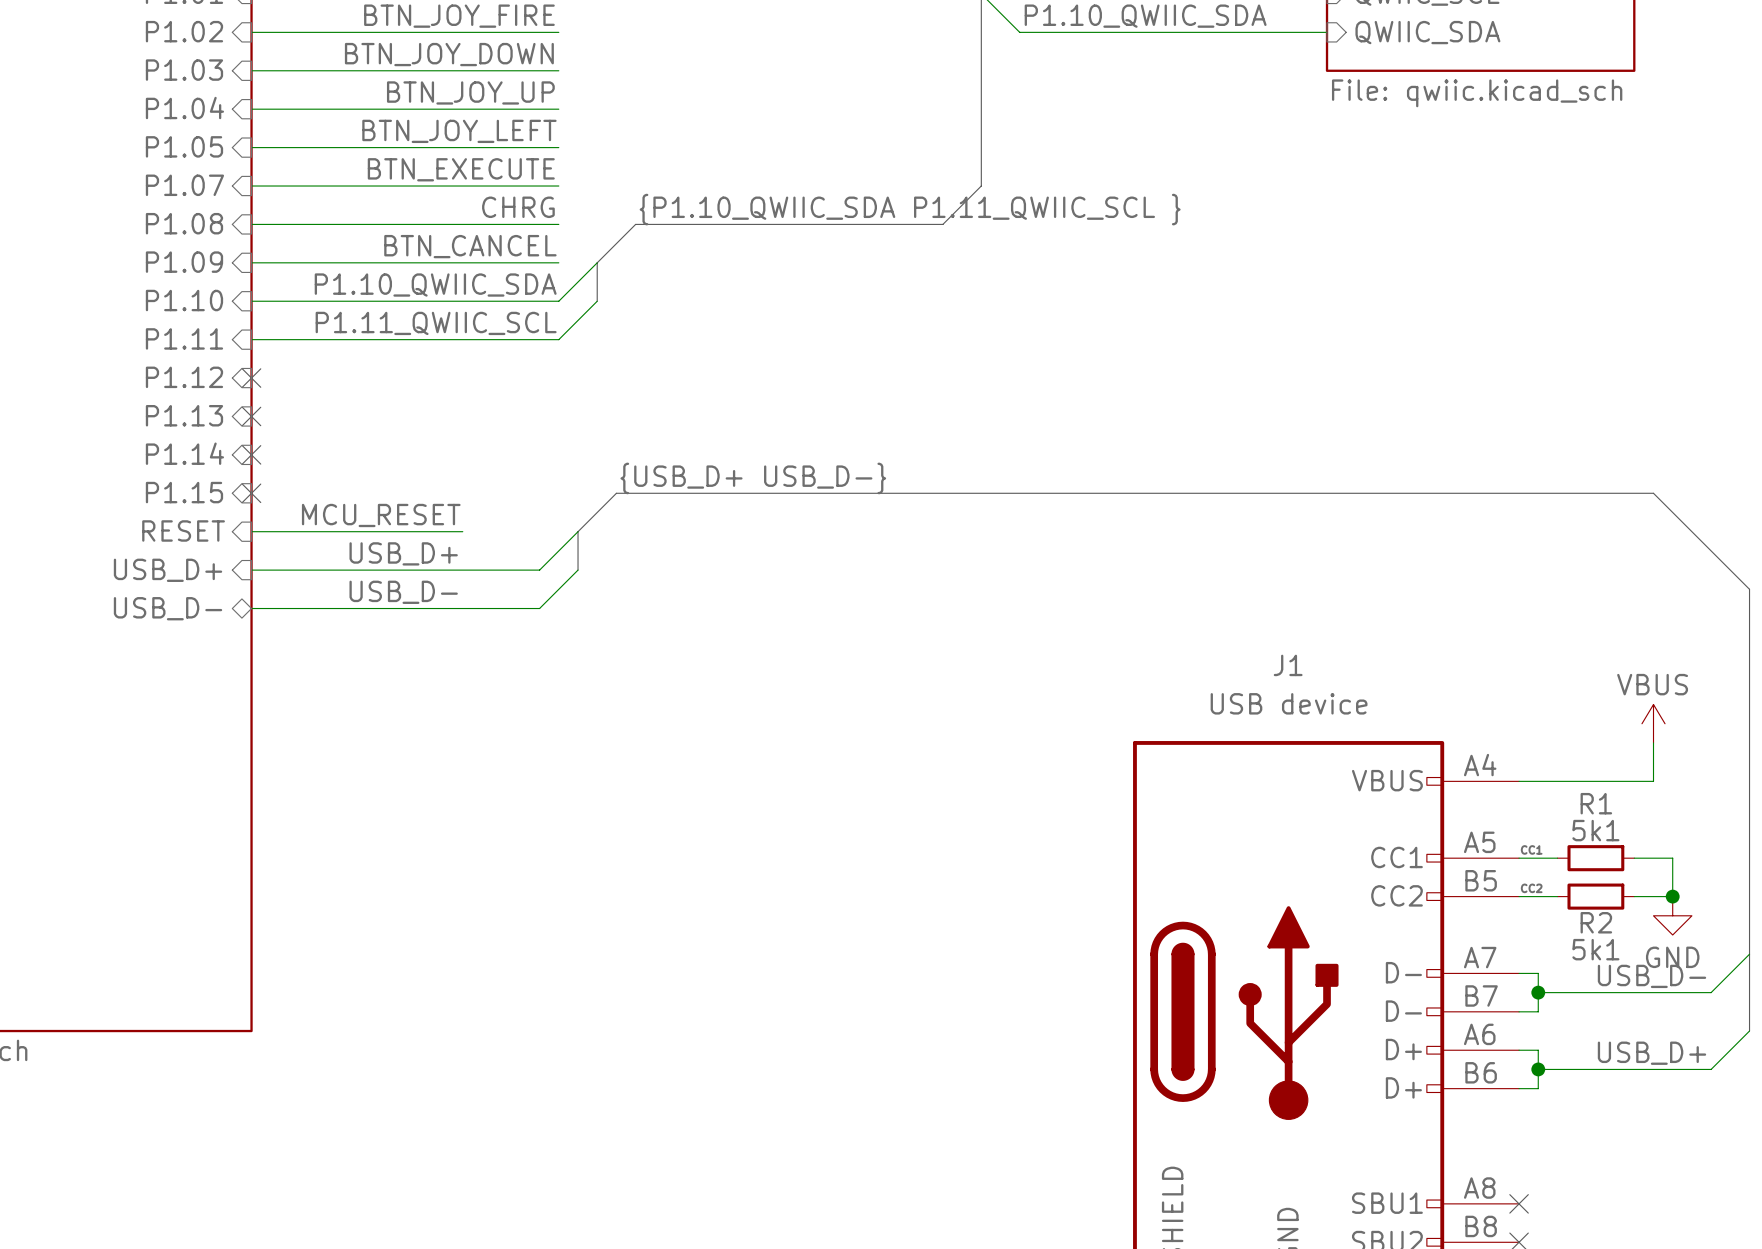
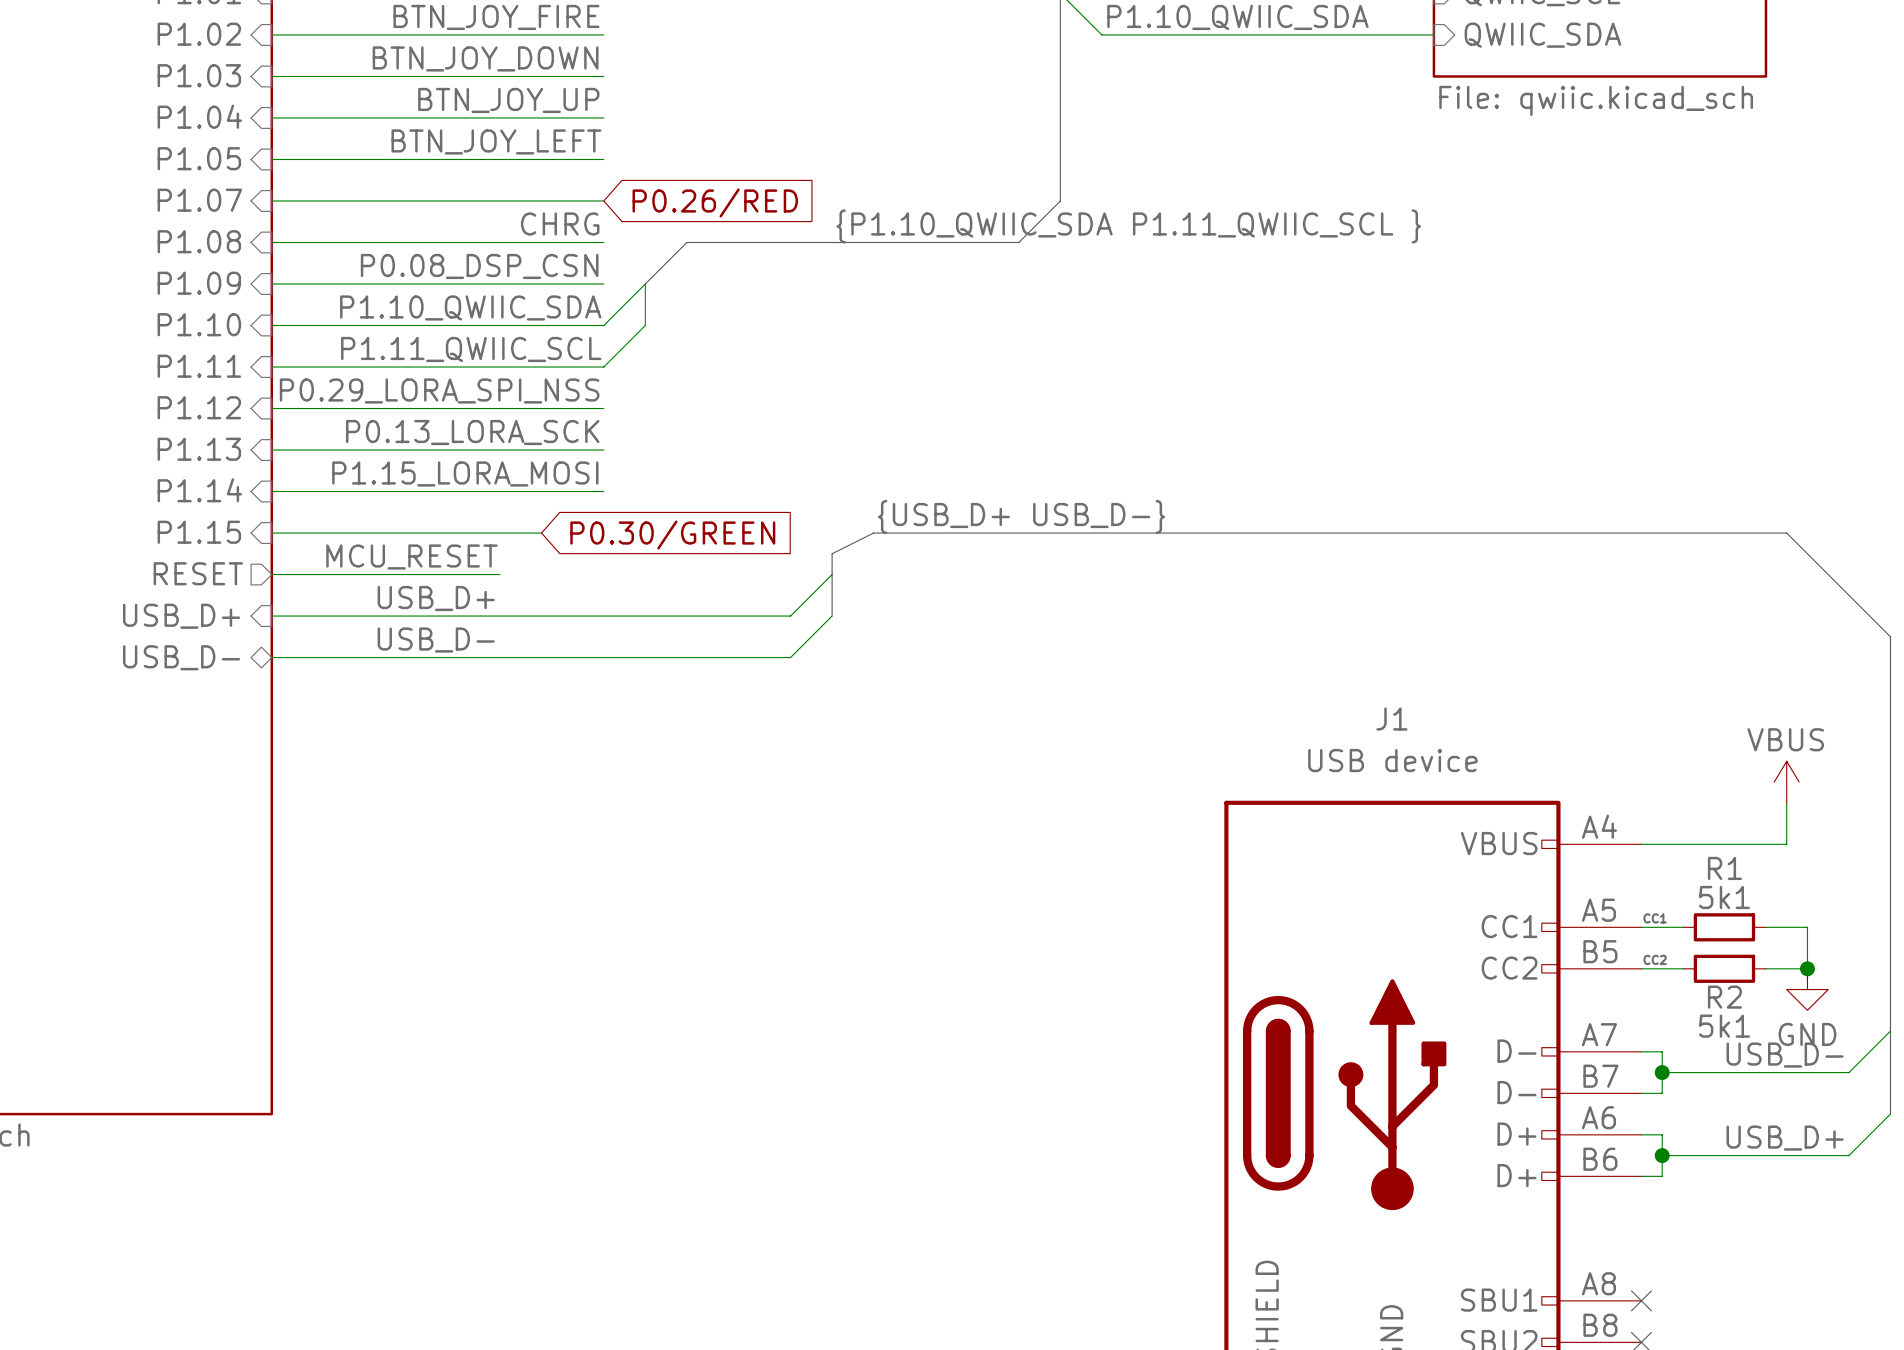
label: BTN_EXECUTE (461, 169) -> none
global label: none -> P0.26/RED (715, 202)
label position: {P1.10_QWIIC_SDA P1.11_QWIIC_SCL } (910, 209) -> {P1.10_QWIIC_SDA P1.11_QWIIC_SCL } (1128, 226)
label: BTN_CANCEL (470, 246) -> P0.08_DSP_CSN (479, 266)
label: none -> P0.29_LORA_SPI_NSS (439, 390)
wire: none -> (271, 408) (603, 408)
no-connect mark: (251, 378) -> none
label: none -> P0.13_LORA_SCK (472, 432)
wire: none -> (271, 450) (603, 450)
no-connect mark: (251, 416) -> none
label: none -> P1.15_LORA_MOSI (465, 473)
wire: none -> (271, 491) (603, 491)
no-connect mark: (251, 454) -> none
label position: {USB_D+ USB_D-} (753, 478) -> {USB_D+ USB_D-} (1021, 516)
wire: none -> (271, 533) (541, 533)
no-connect mark: (251, 493) -> none
bus: (808, 493) (616, 493) (578, 531) (578, 570) -> (873, 533) (832, 553) (832, 616)
global label: none -> P0.30/GREEN (672, 535)
sheet pin shape: input (183, 530) -> output (198, 573)
wire: (578, 531) (539, 570) -> (832, 574) (790, 616) (583, 616)
wire: (578, 570) (539, 608) -> (832, 616) (790, 657) (583, 657)

